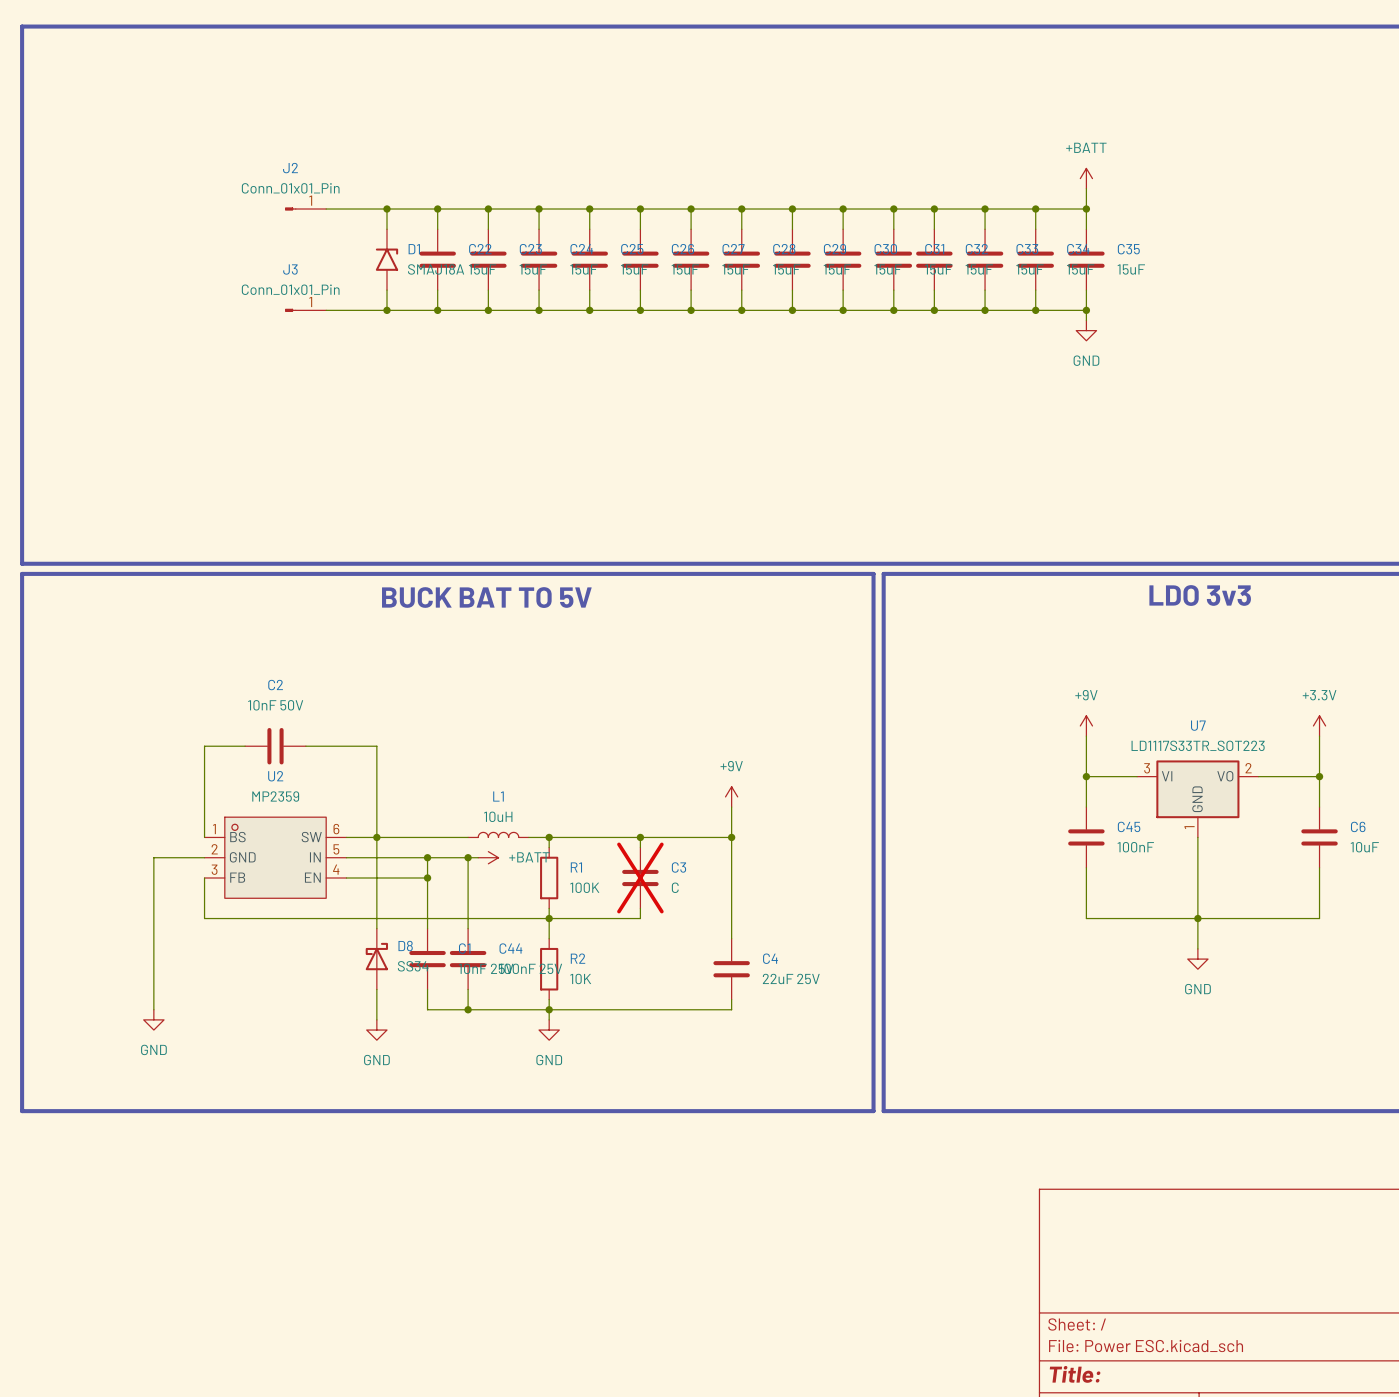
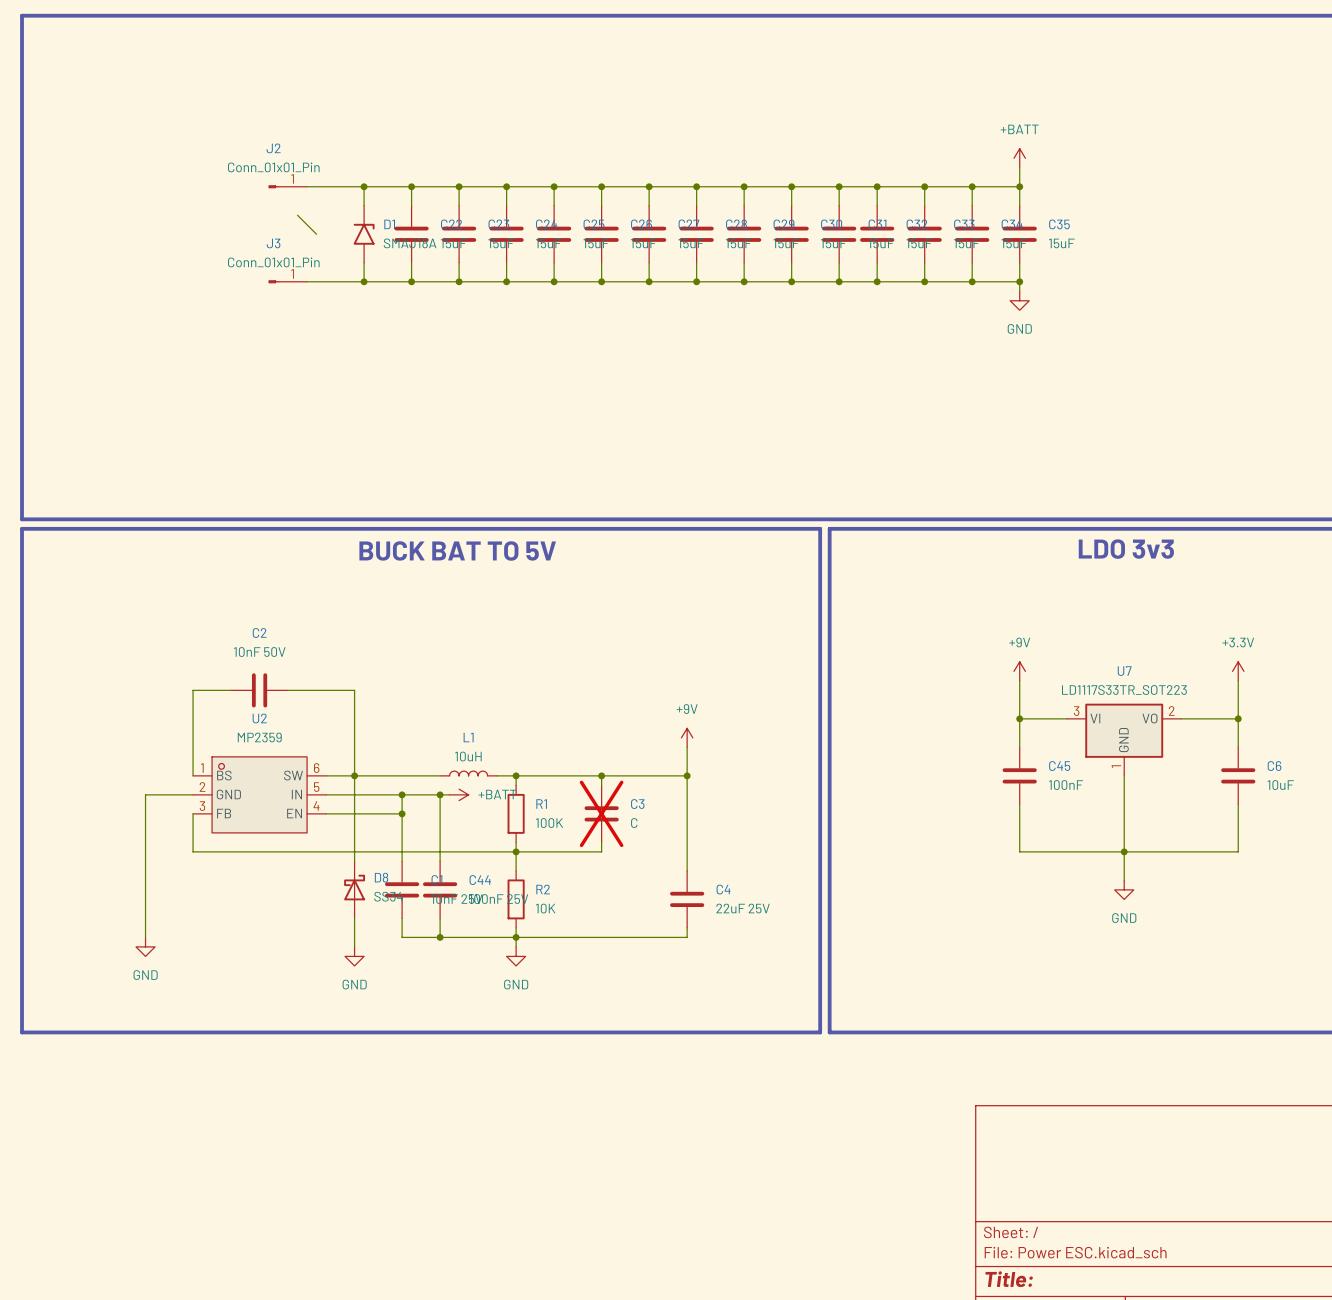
wire: none -> (297, 215) (316, 234)

